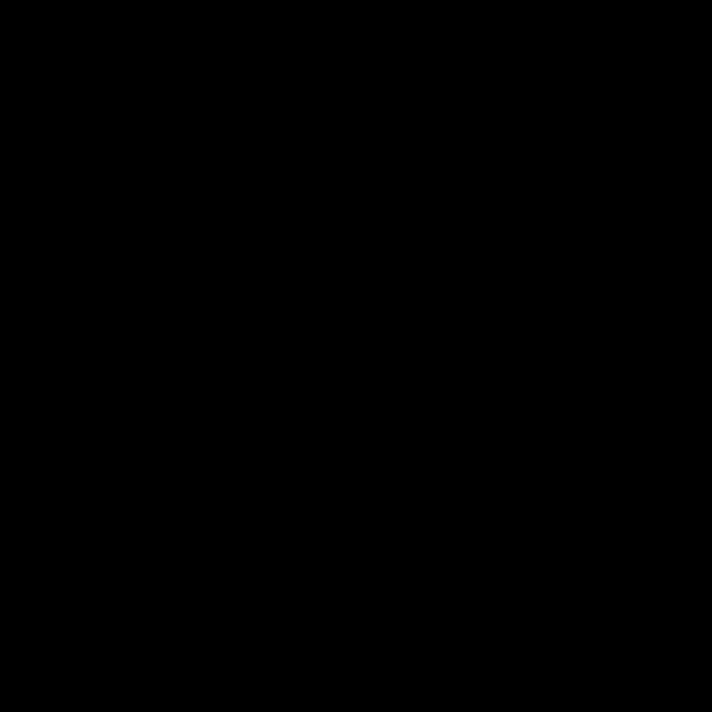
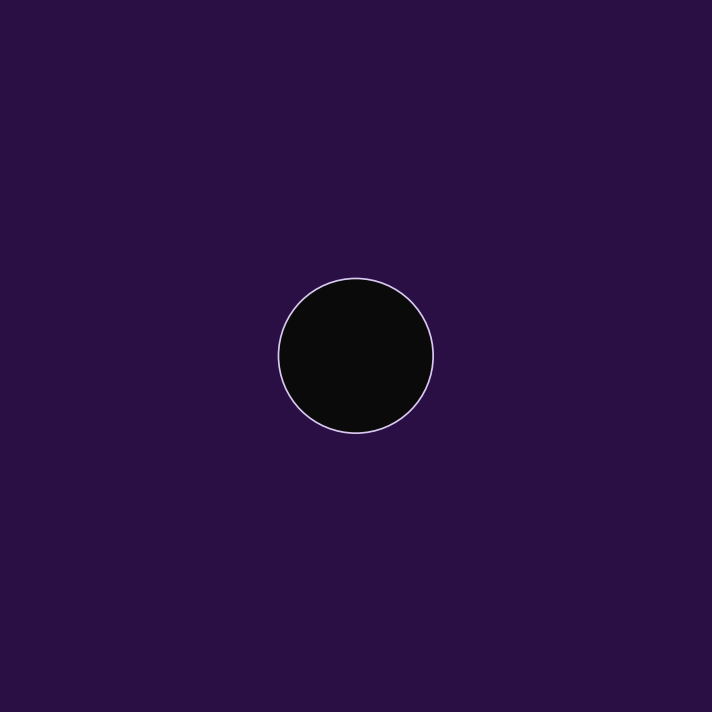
part: none -> (355, 355)

